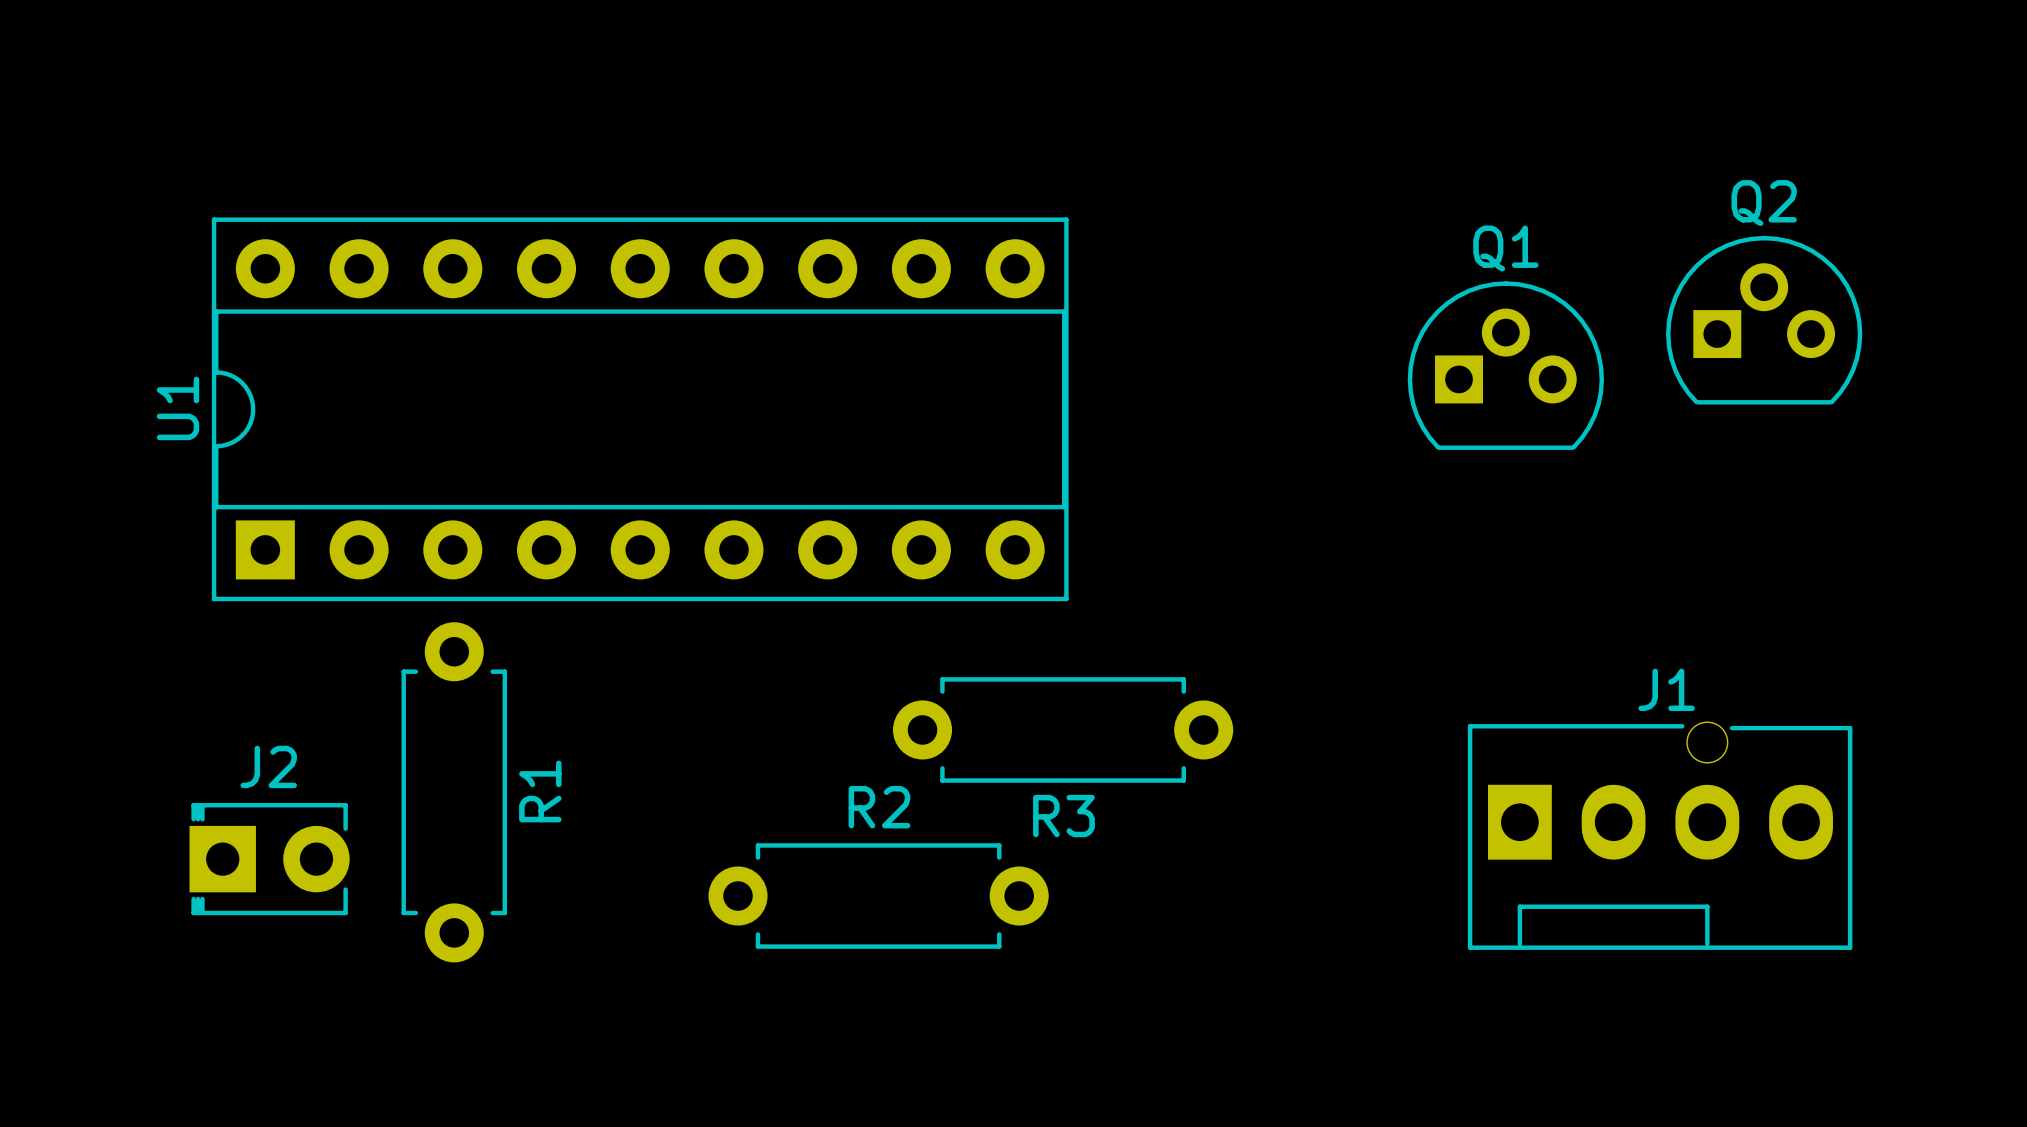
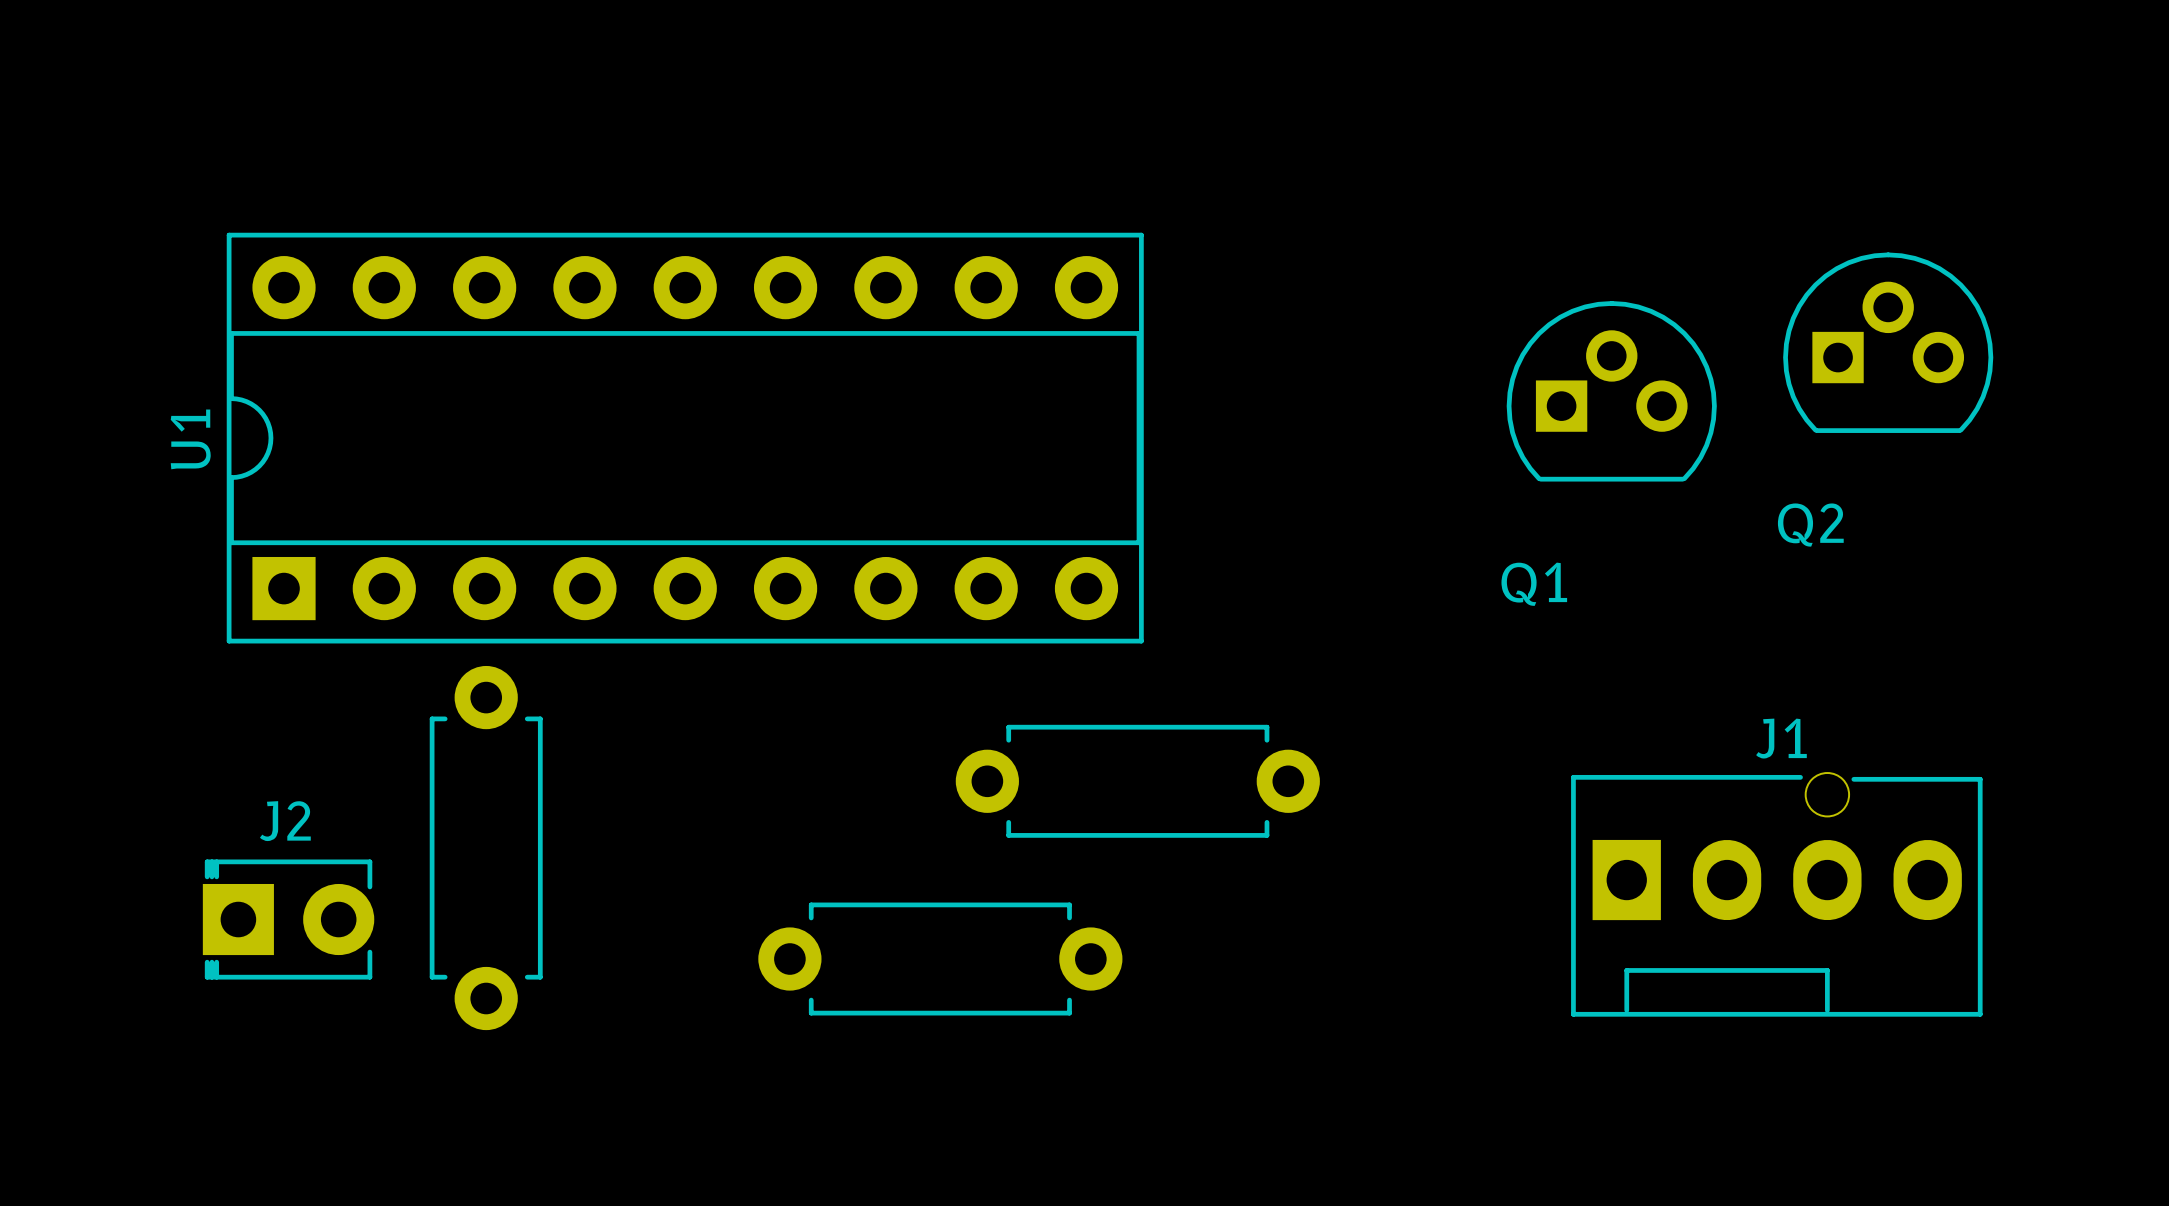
Q2 name position: Q2 (1764, 203) -> Q2 (1810, 525)
Q1 name position: Q1 (1505, 248) -> Q1 (1534, 584)
R1 name: R1 (540, 791) -> none
R2 name: R2 (879, 807) -> none
R3 name: R3 (1063, 816) -> none

